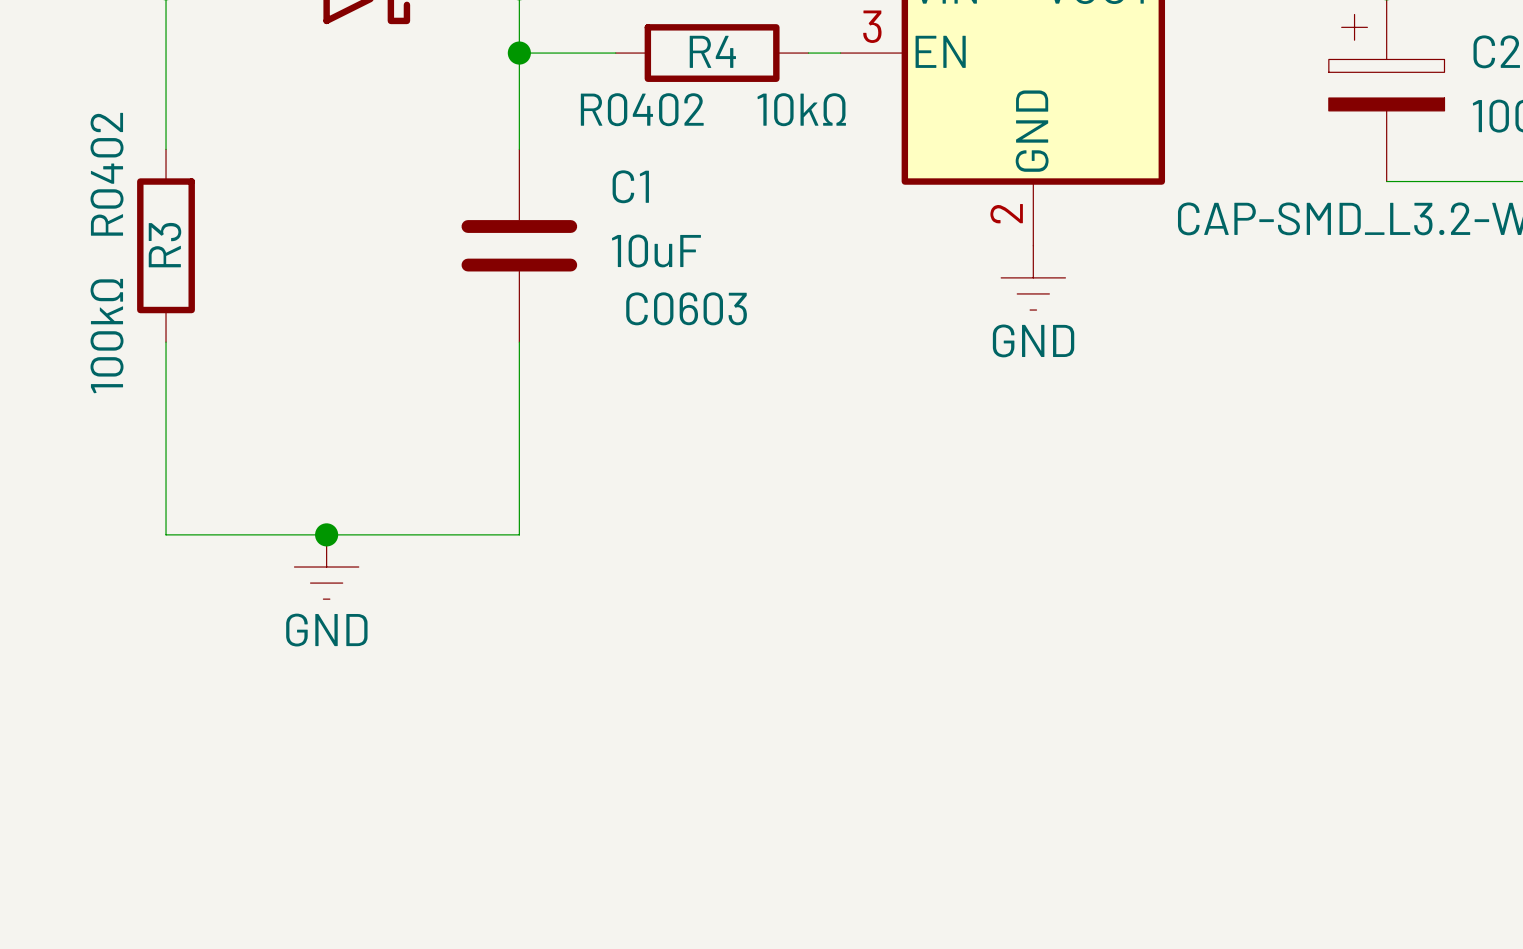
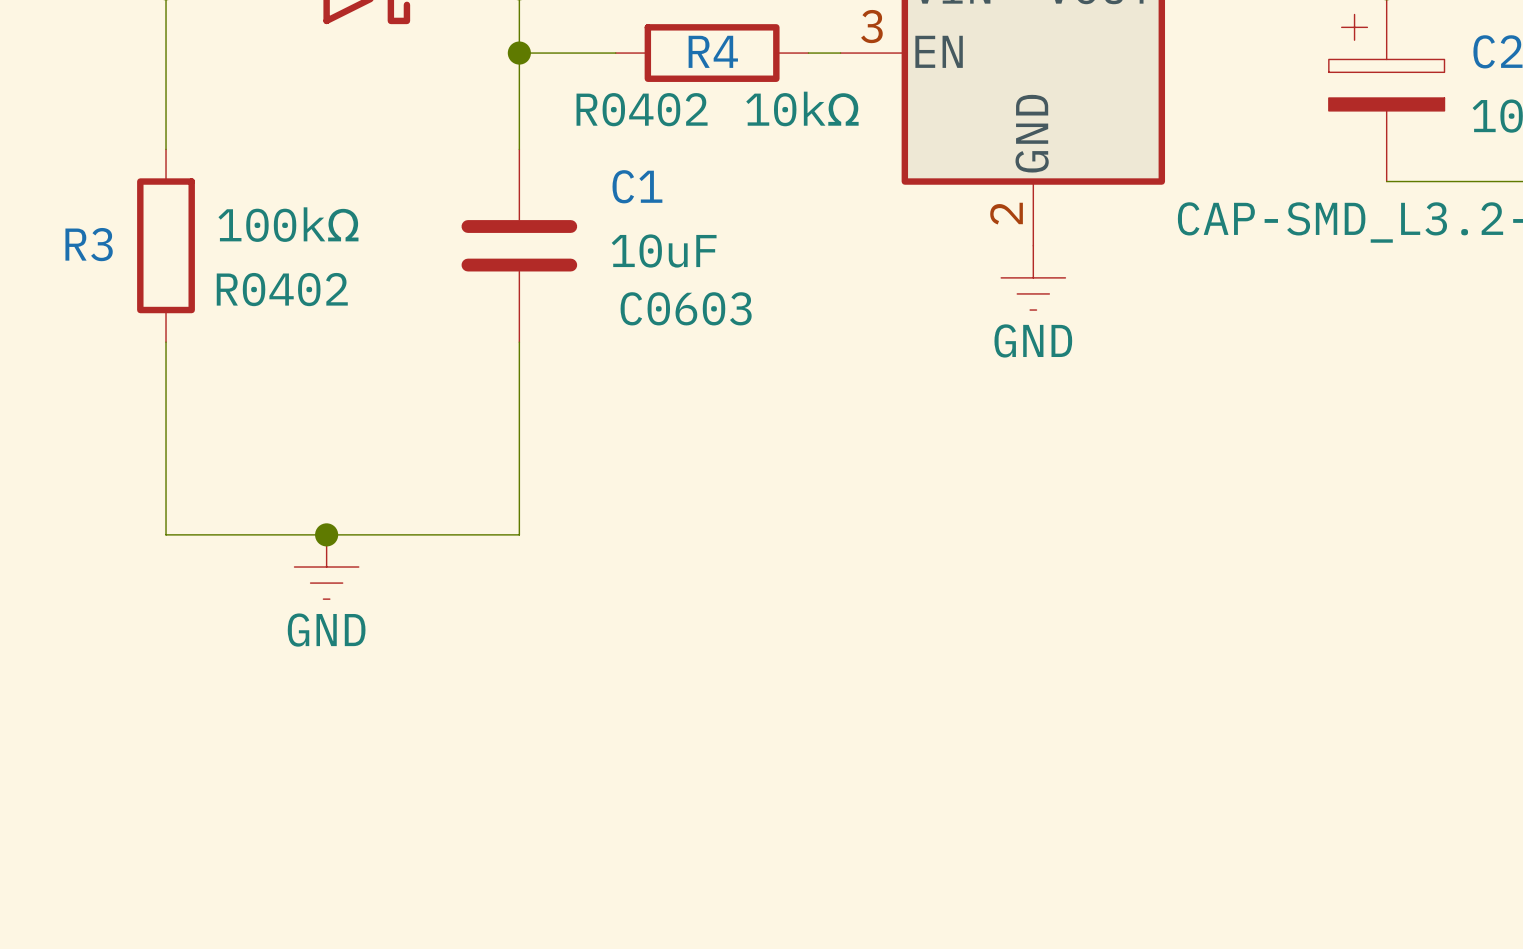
R3 text rotation: 0° (107, 174) -> 90° clockwise (282, 289)
R3 text position: R0402 (107, 174) -> R0402 (282, 289)
R3 name rotation: 0° (164, 245) -> 90° clockwise (89, 244)
R3 value rotation: 0° (107, 336) -> 90° clockwise (288, 224)
R3 value position: 100kΩ (107, 336) -> 100kΩ (288, 224)

